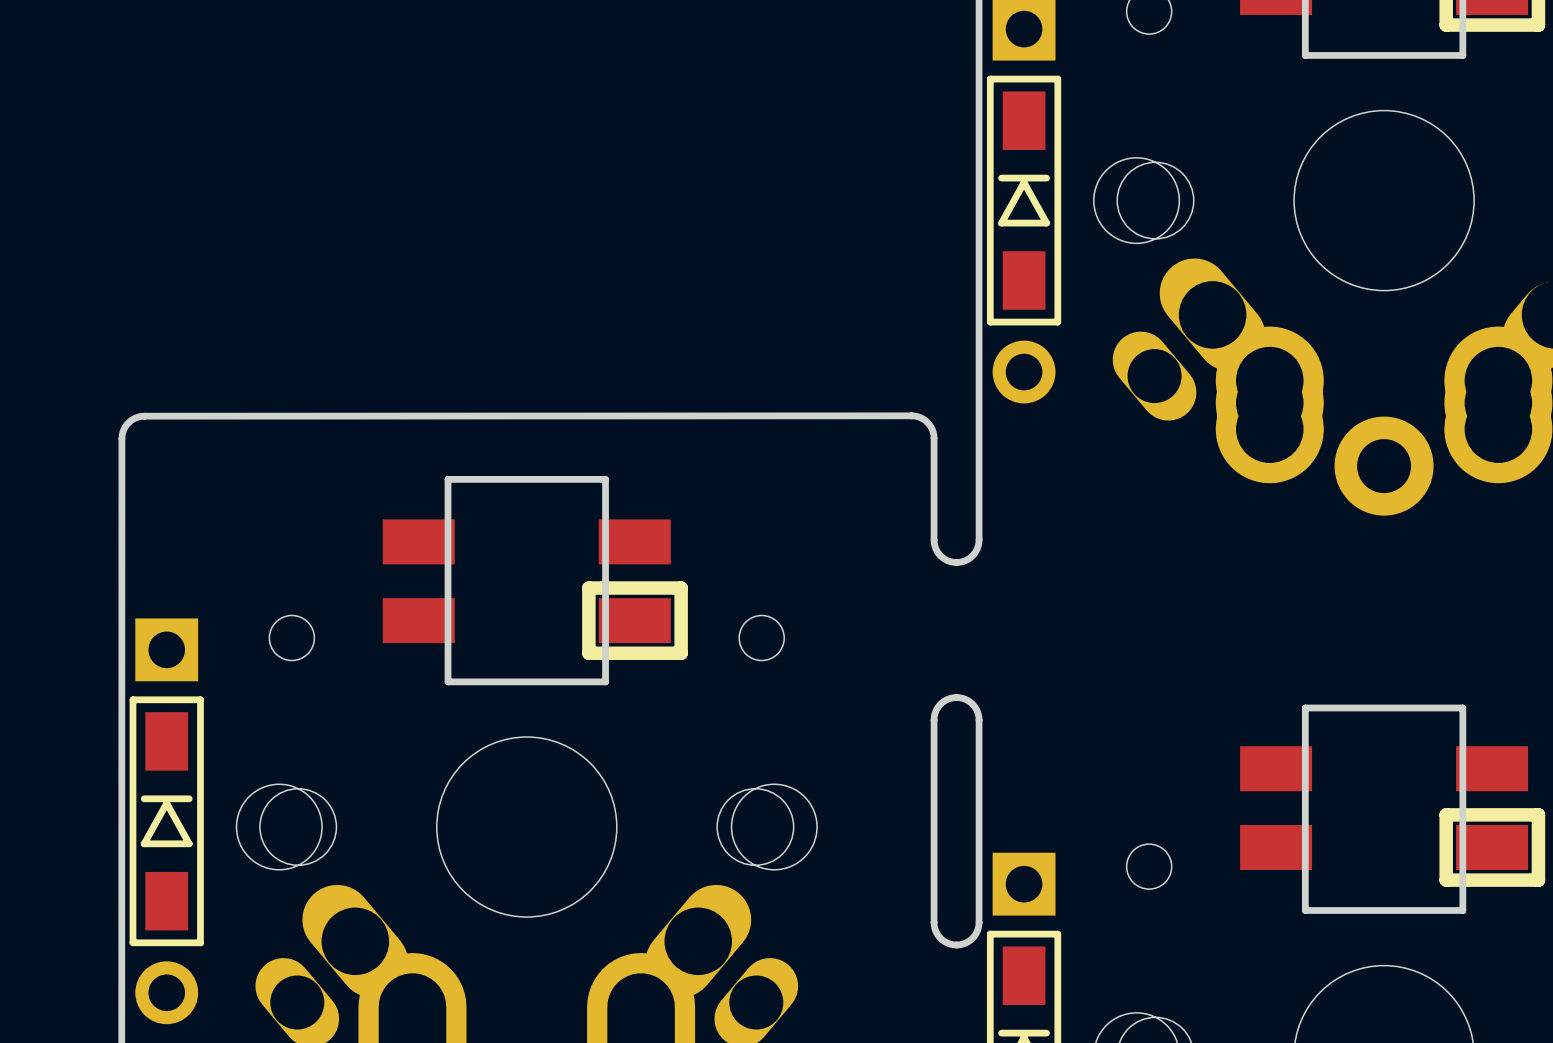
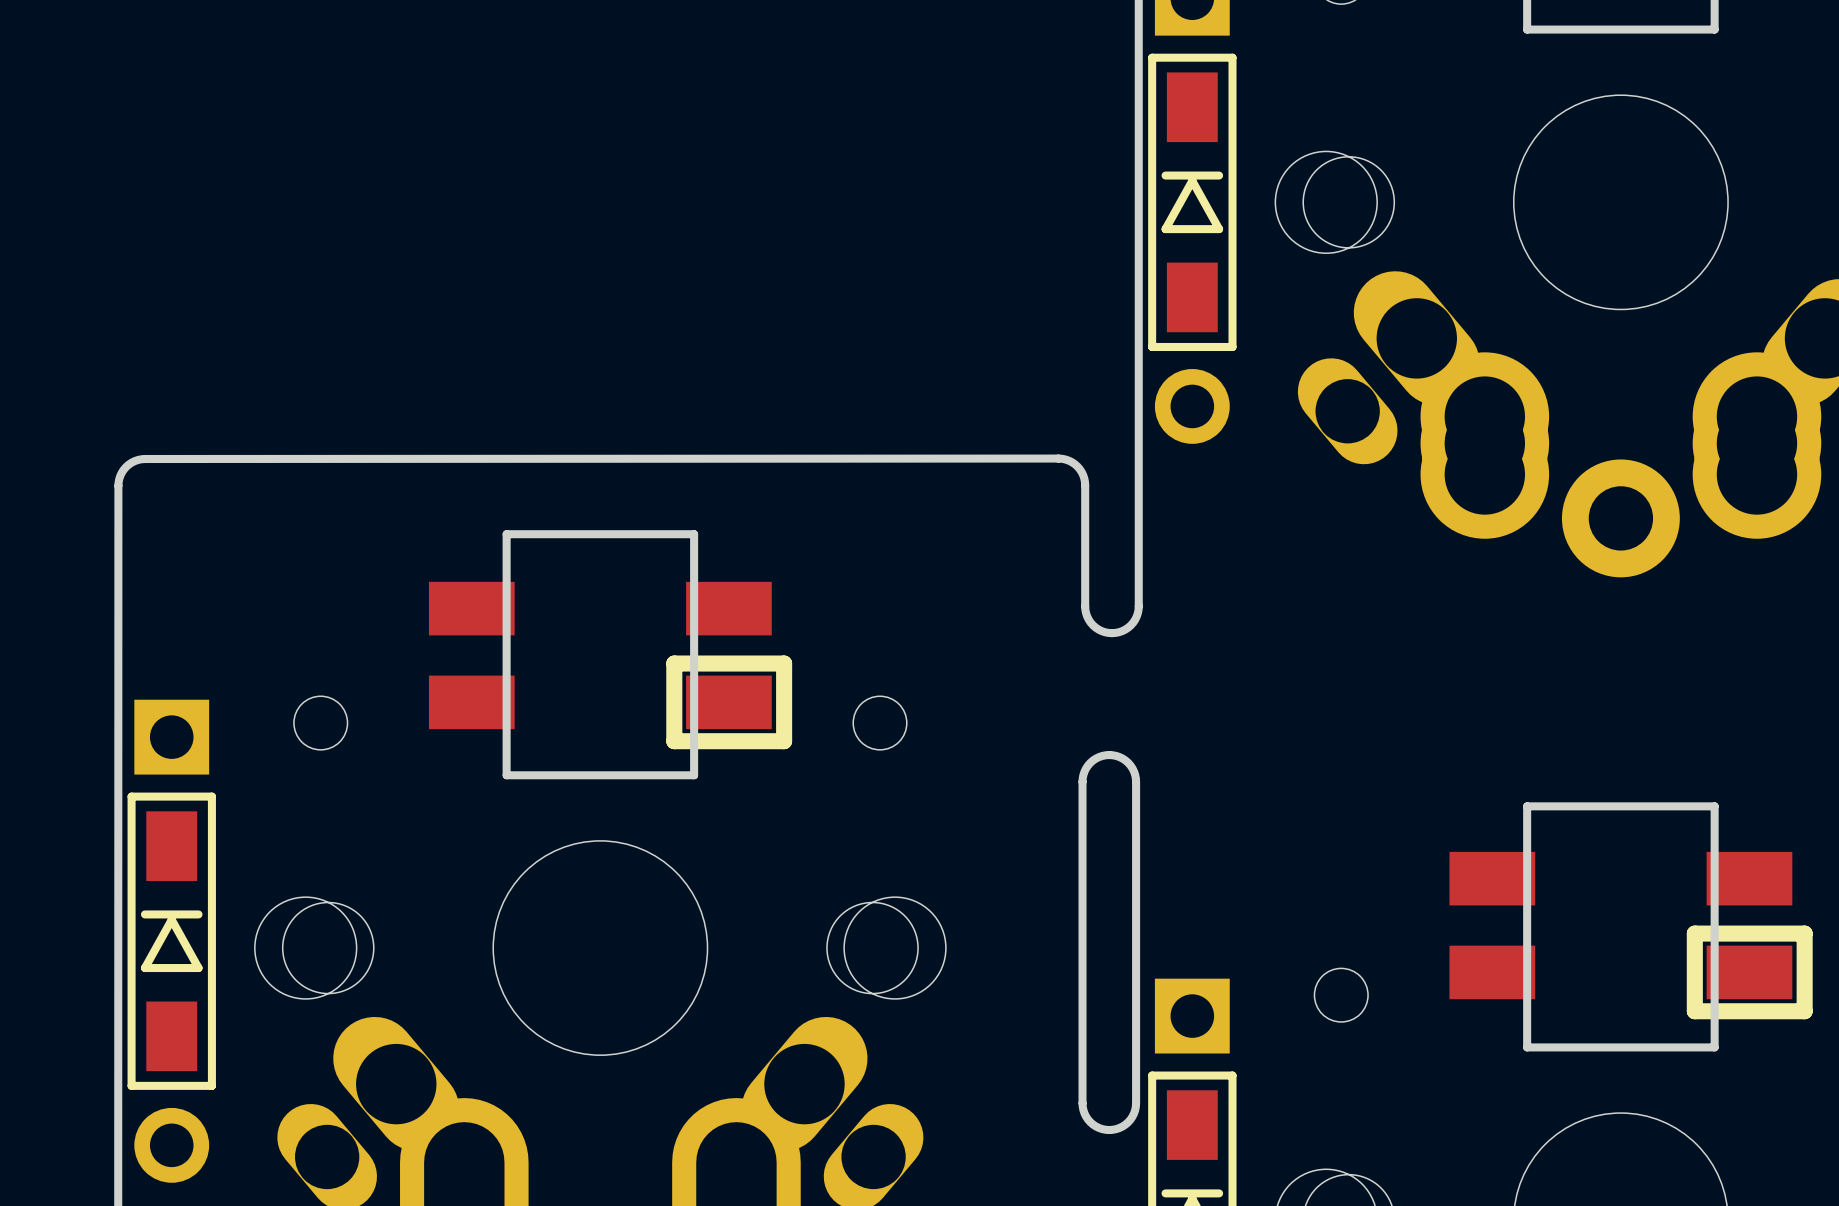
board edge: (956, 697) (947, 699) (940, 704) (935, 711) (934, 720) (934, 925) (937, 933) (942, 940) (956, 945) (965, 943) (972, 938) (977, 931) (979, 922) (978, 717) (976, 708) (970, 702) (956, 697) -> (1109, 755) (1099, 757) (1090, 762) (1084, 771) (1082, 781) (1082, 1106) (1086, 1116) (1092, 1124) (1109, 1130) (1119, 1127) (1128, 1122) (1134, 1113) (1136, 1103) (1135, 778) (1132, 768) (1125, 760) (1109, 755)

